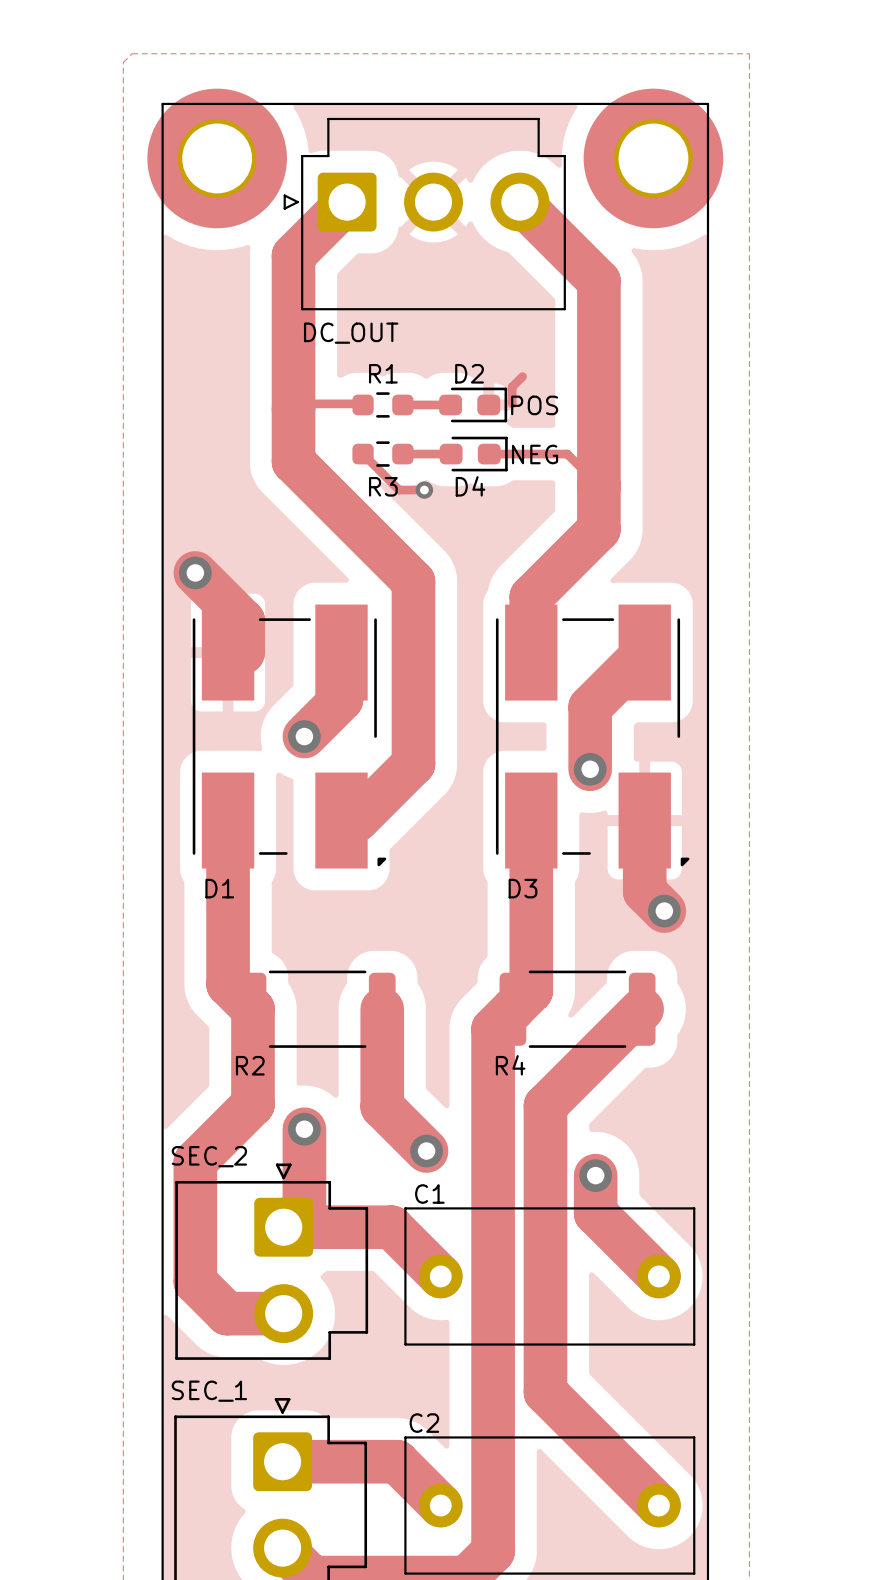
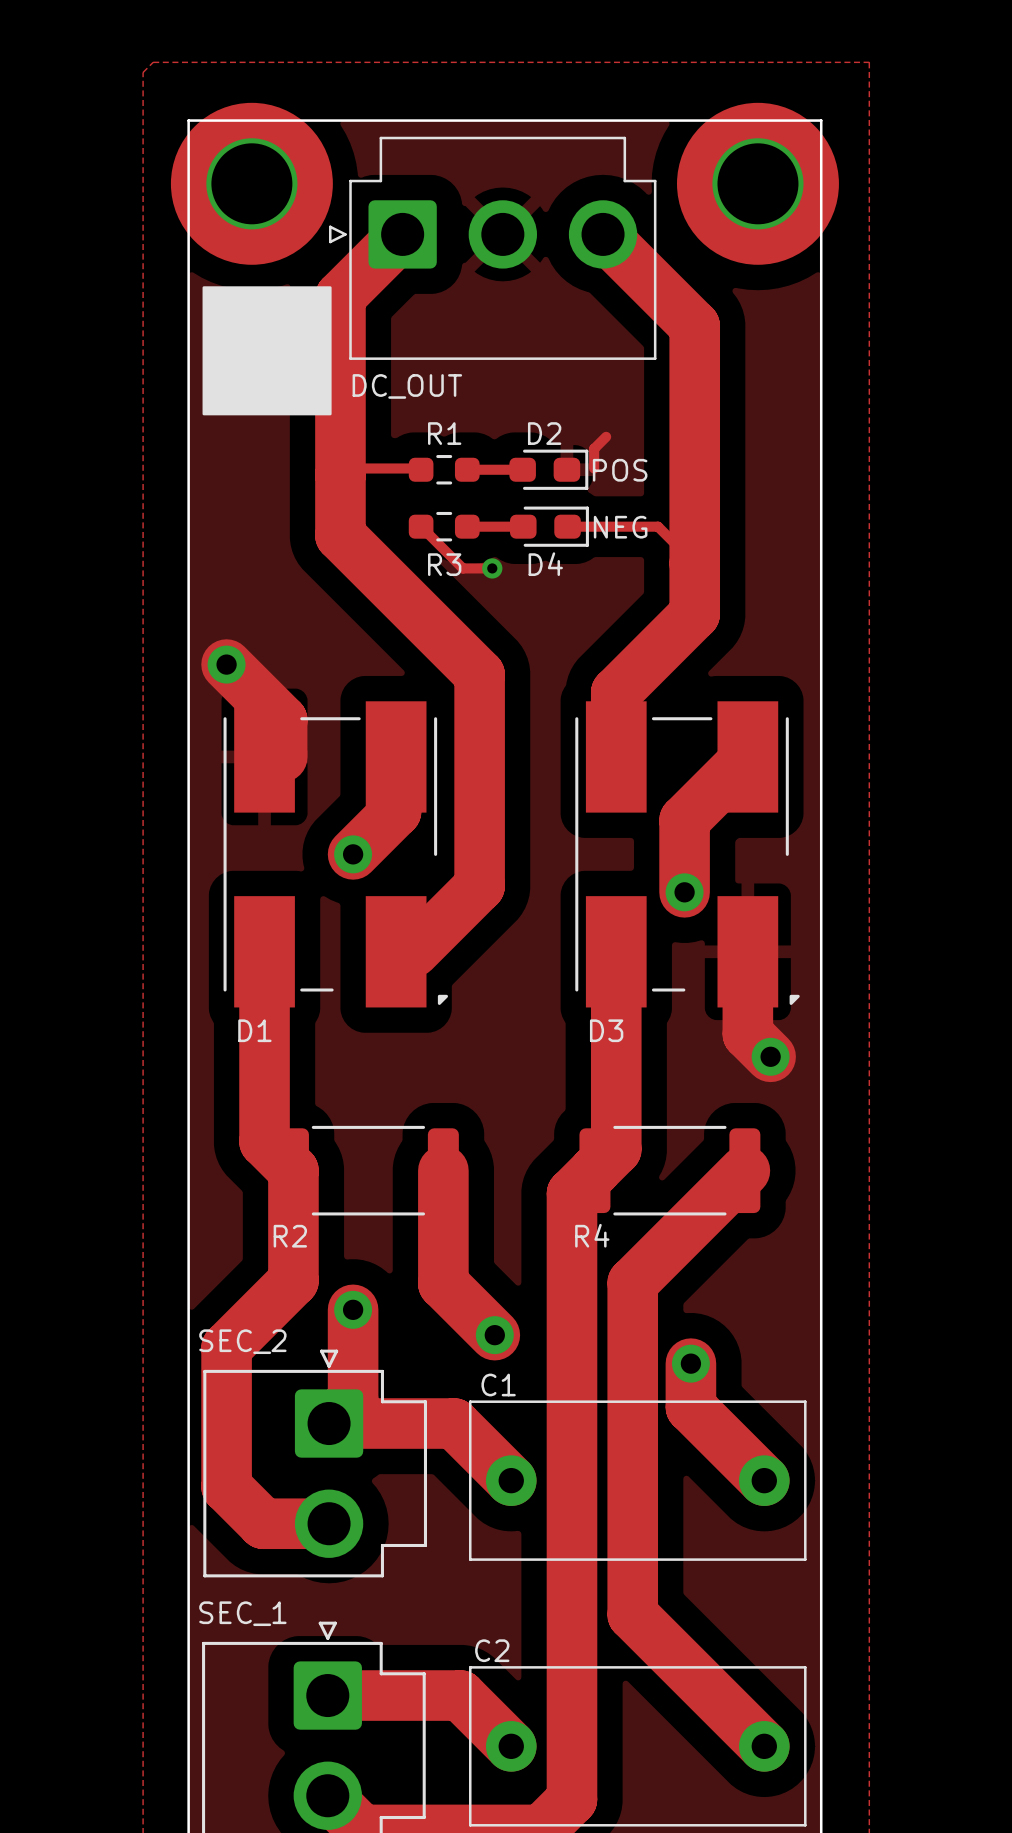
drawing: none -> [202, 286, 332, 416]

